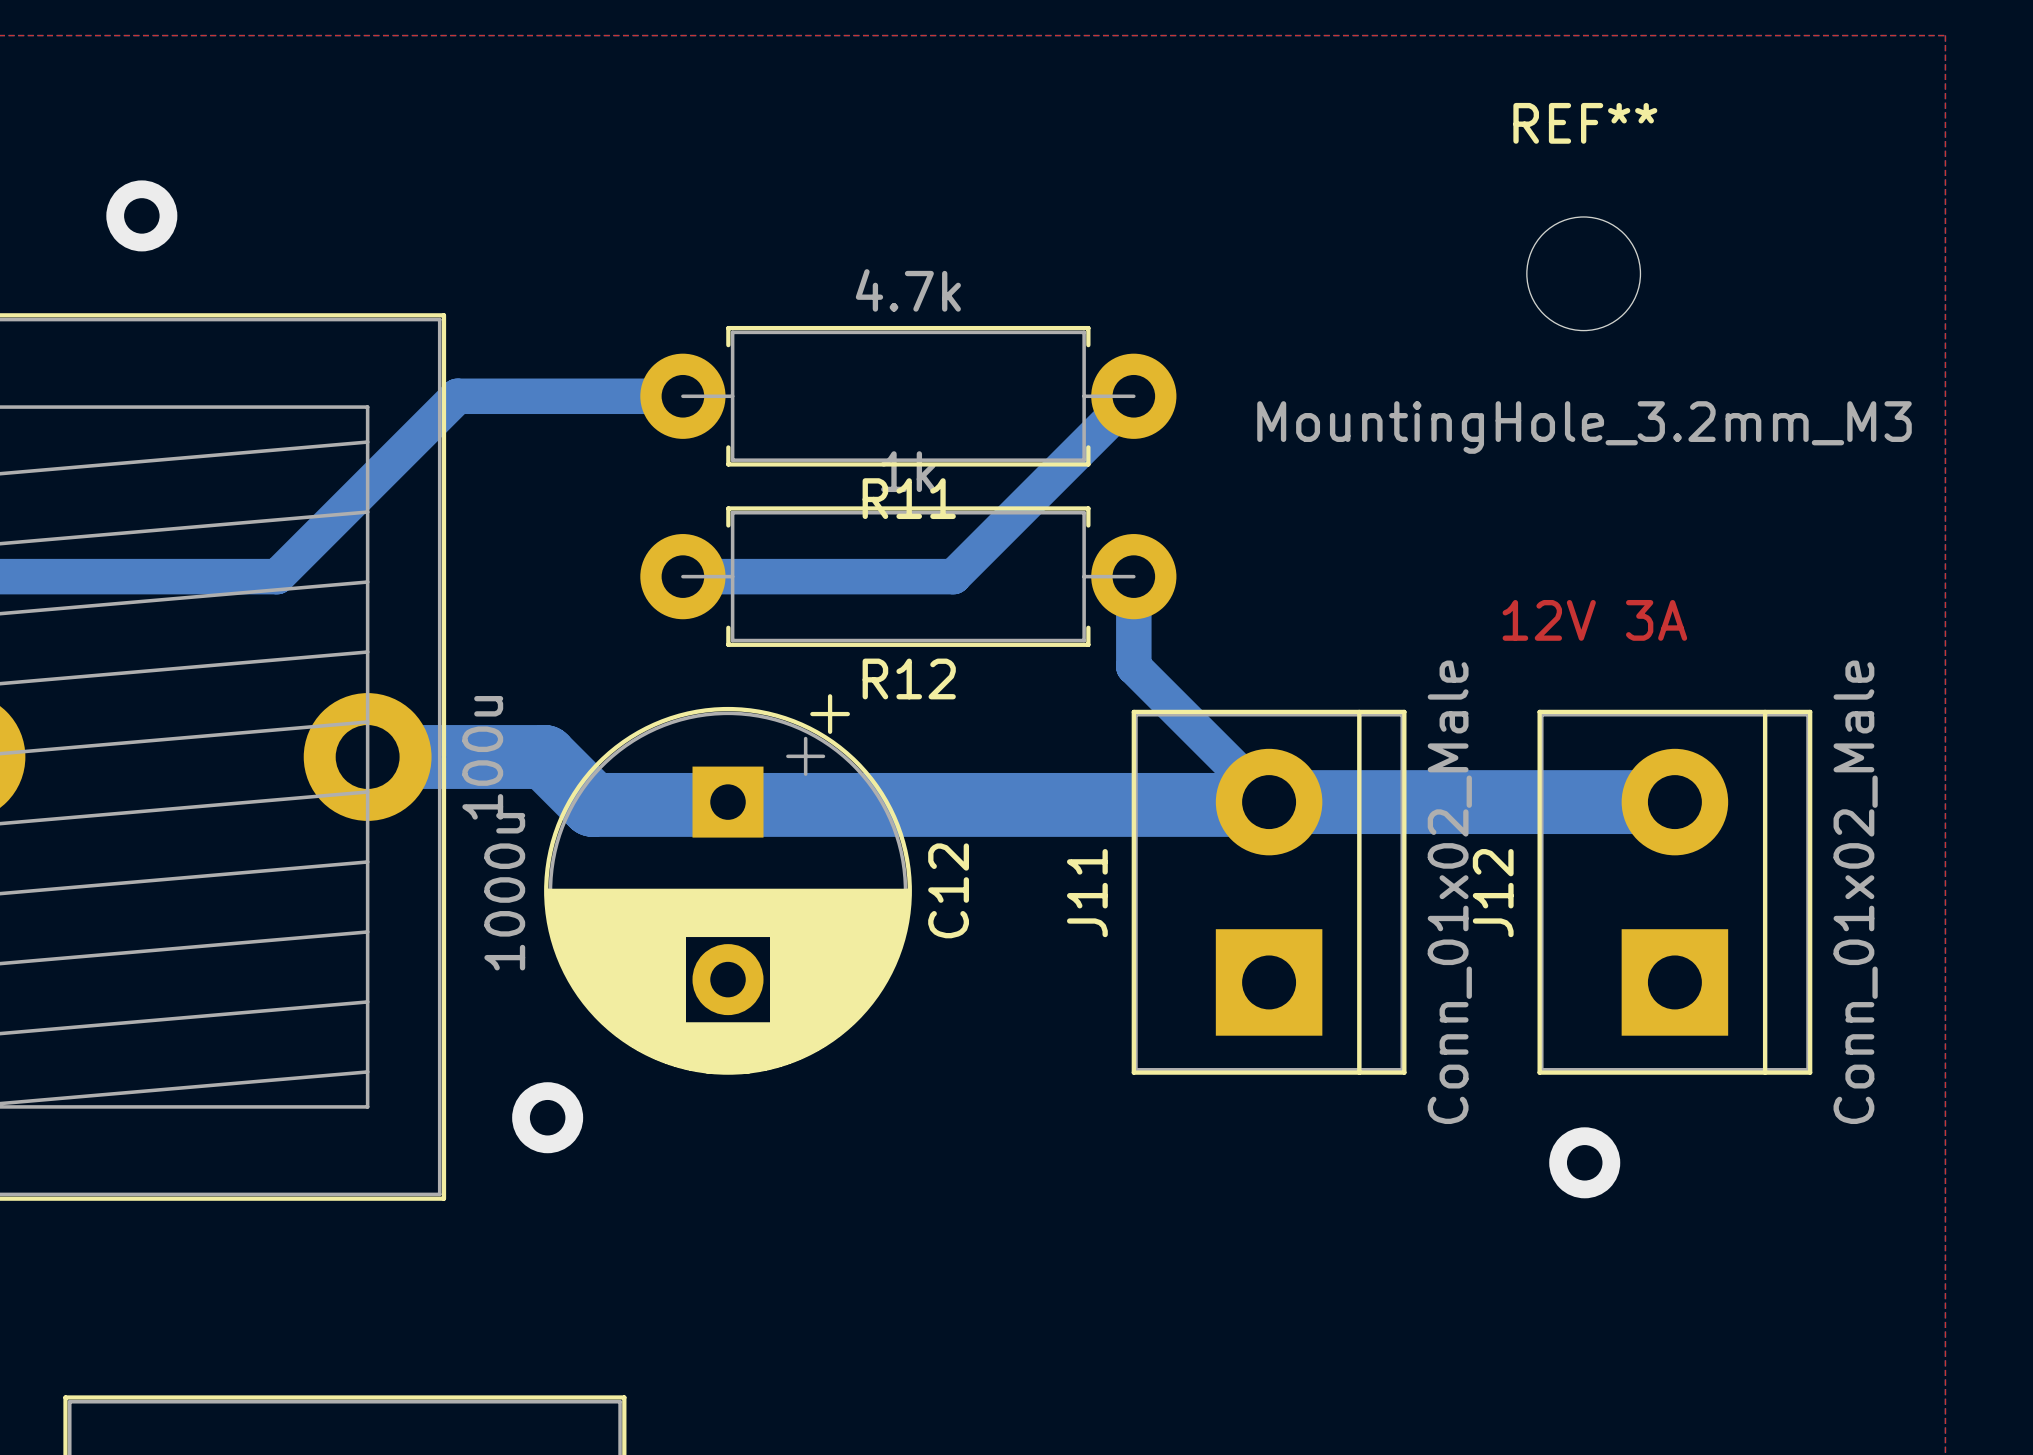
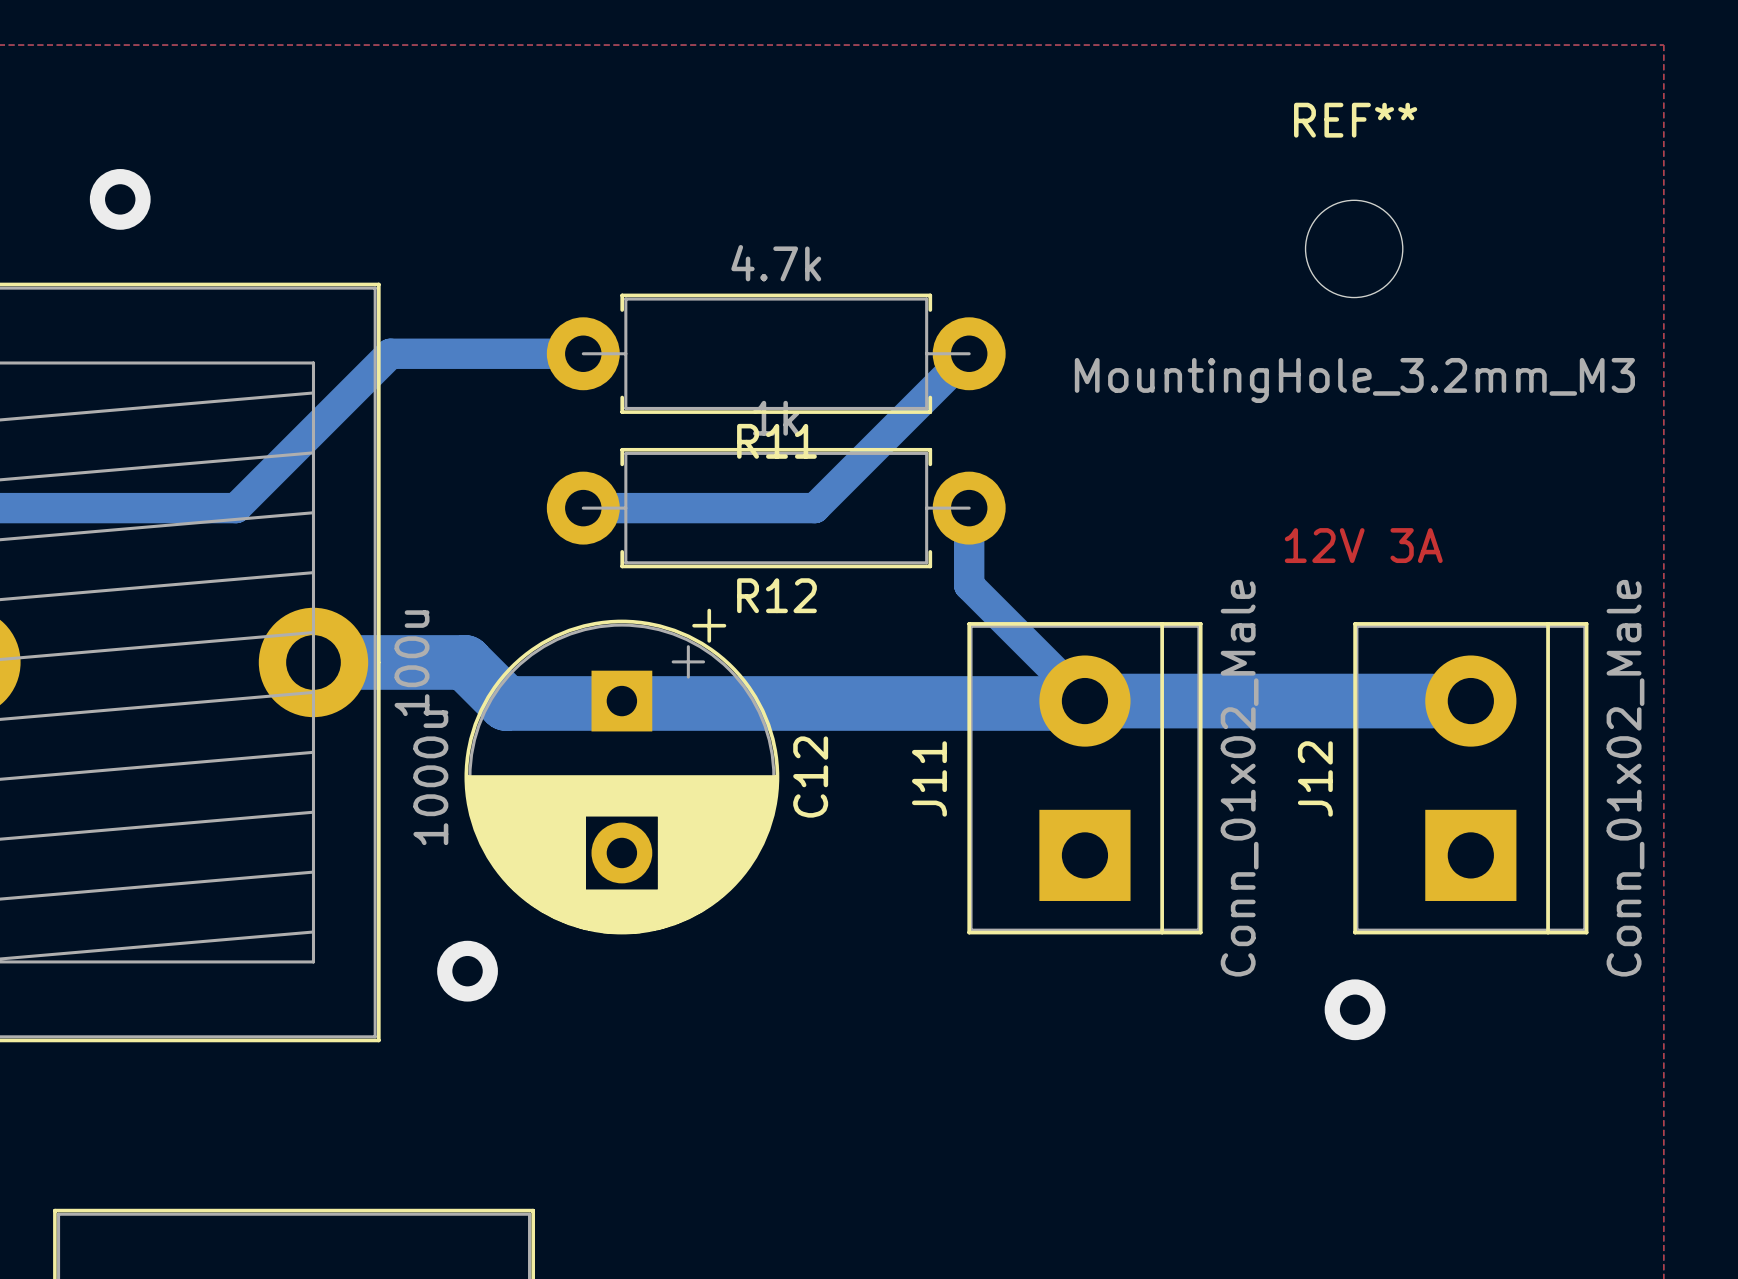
J12 position: (1674, 892) -> (1470, 778)

